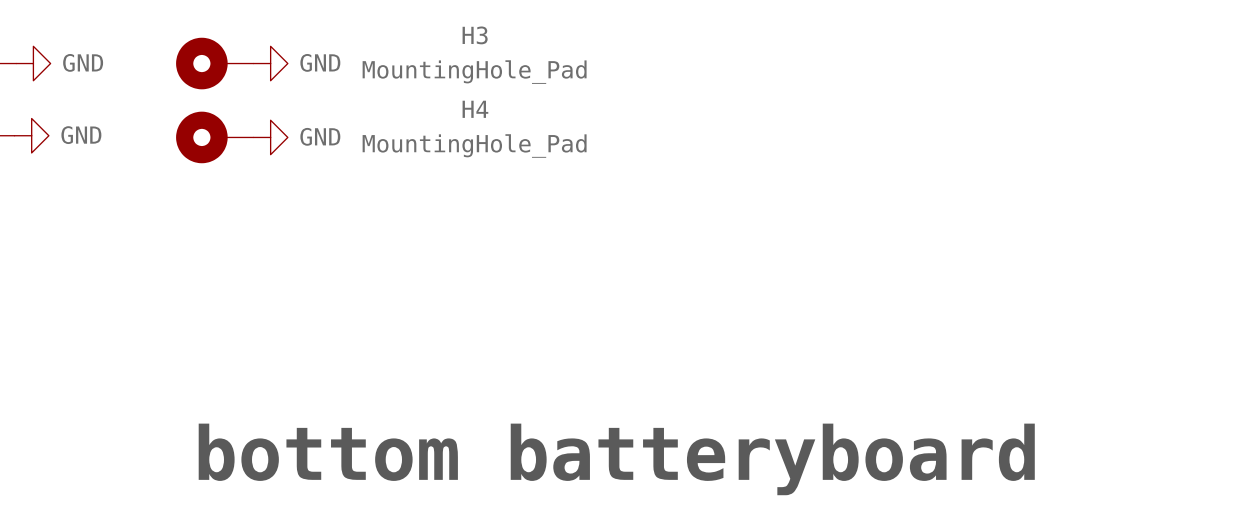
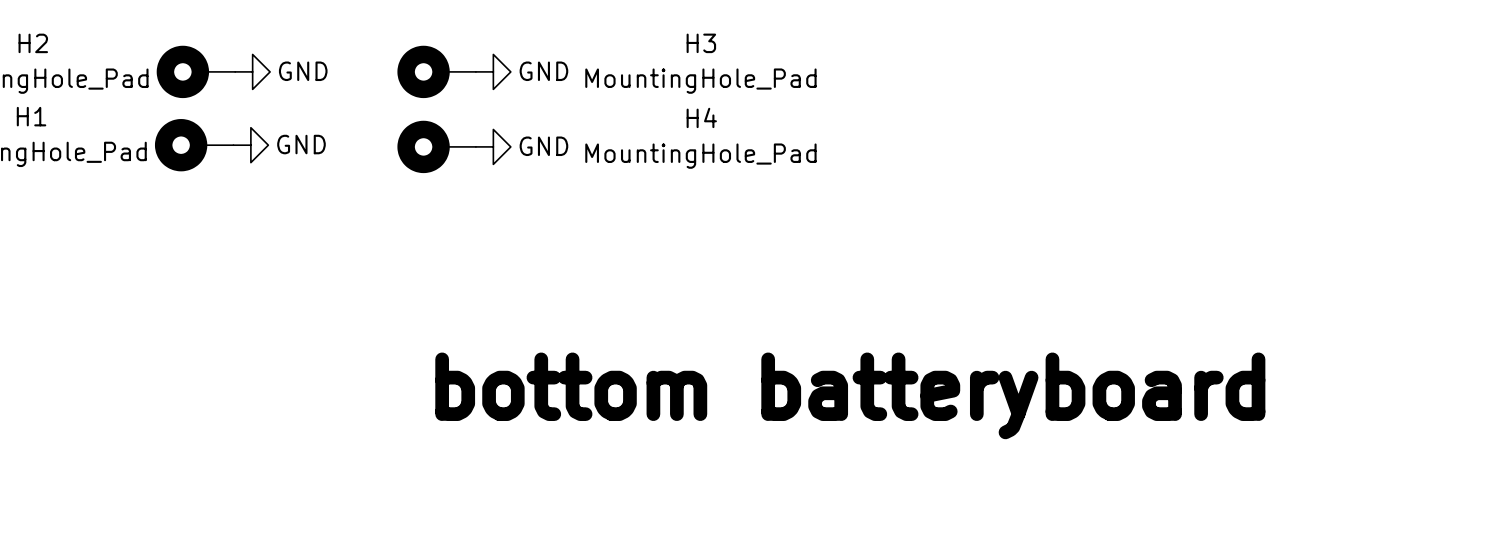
text position: bottom batteryboard (616, 459) -> bottom batteryboard (850, 395)

